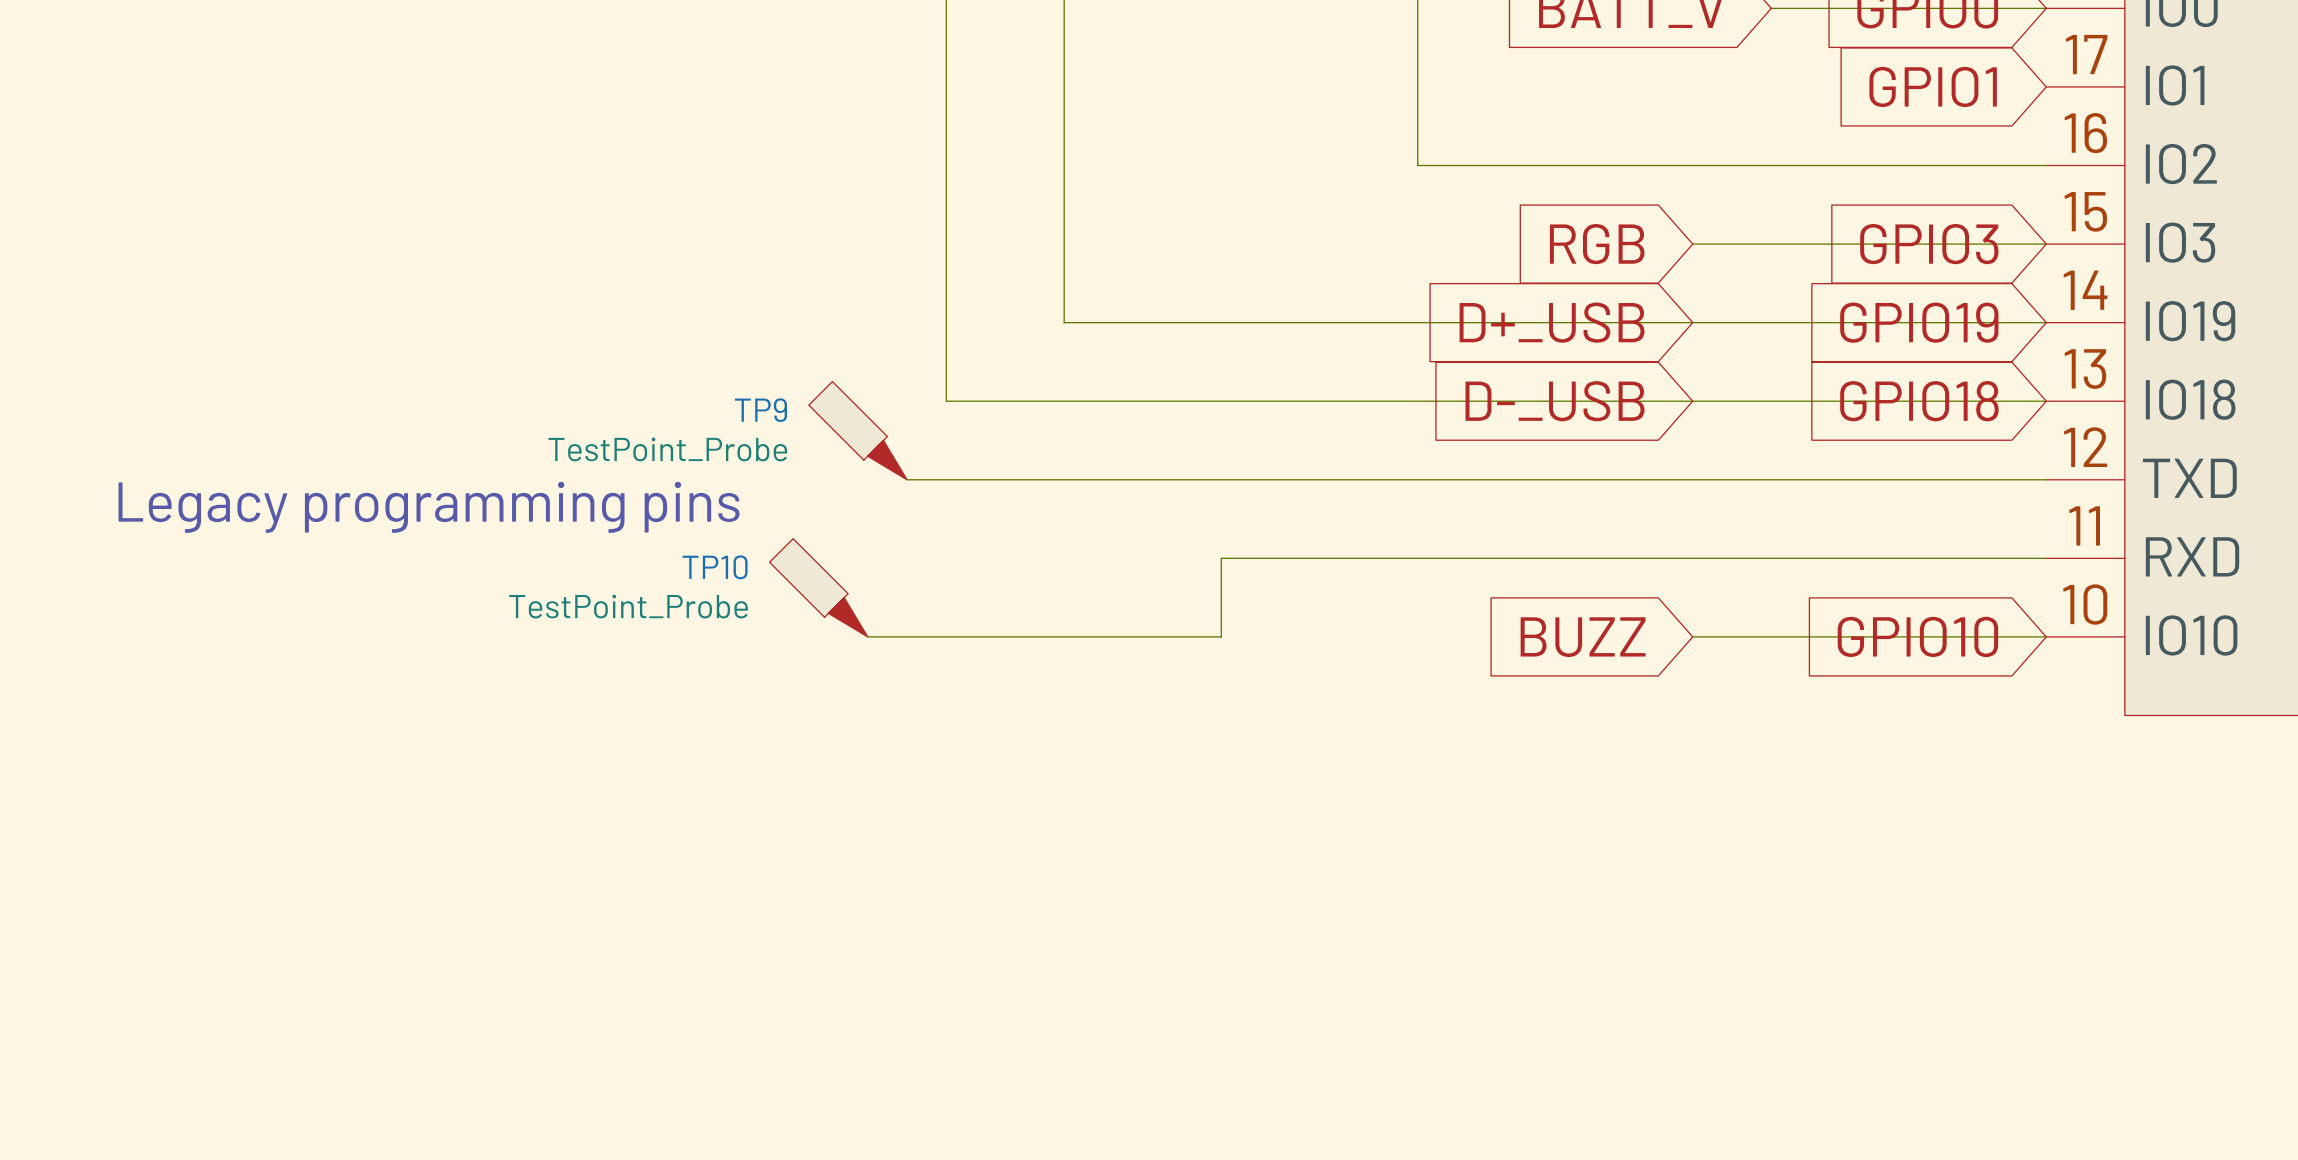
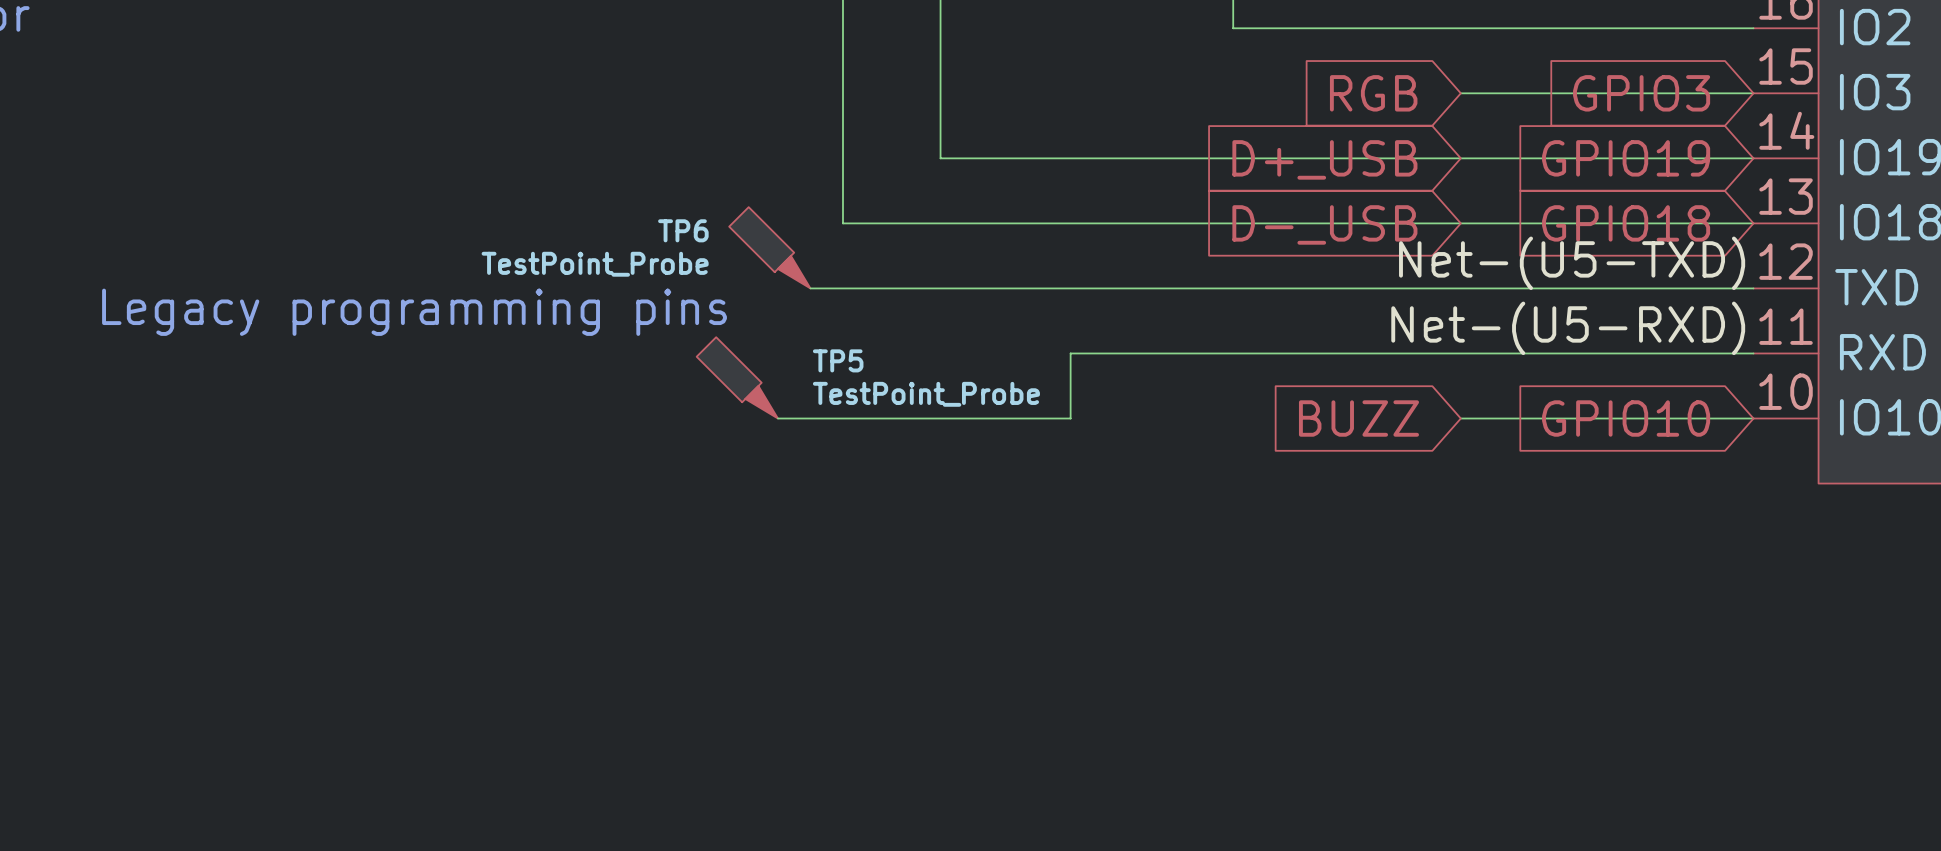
TP9 name: TP9 (760, 410) -> TP6 (683, 230)
label: none -> Net-(U5-TXD) (1572, 263)
label: none -> Net-(U5-RXD) (1568, 328)
TP10 name: TP10 (715, 567) -> TP5 (838, 360)
TP10 value position: TestPoint_Probe (628, 606) -> TestPoint_Probe (926, 394)

